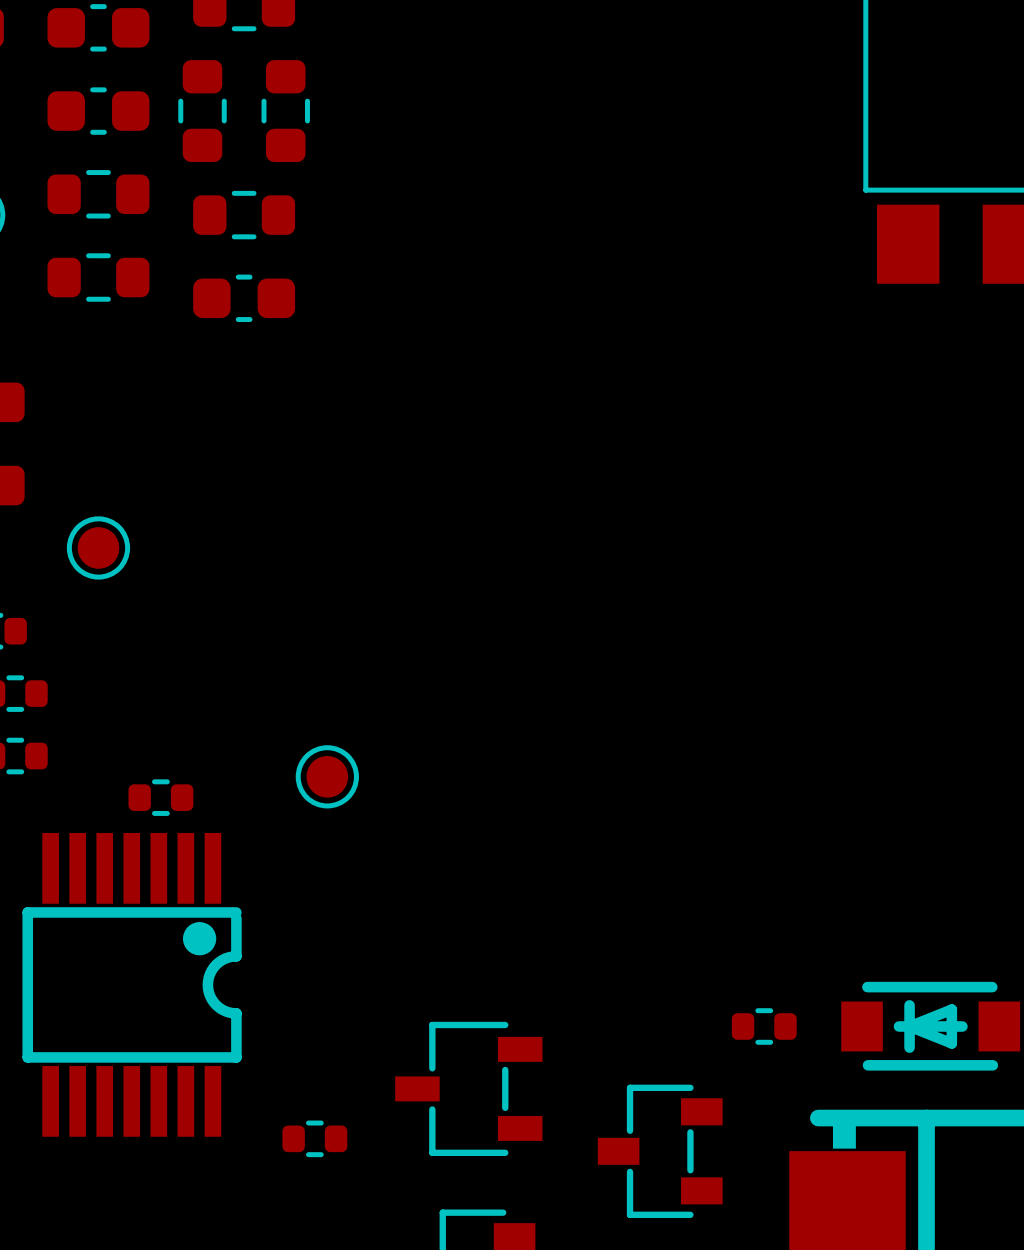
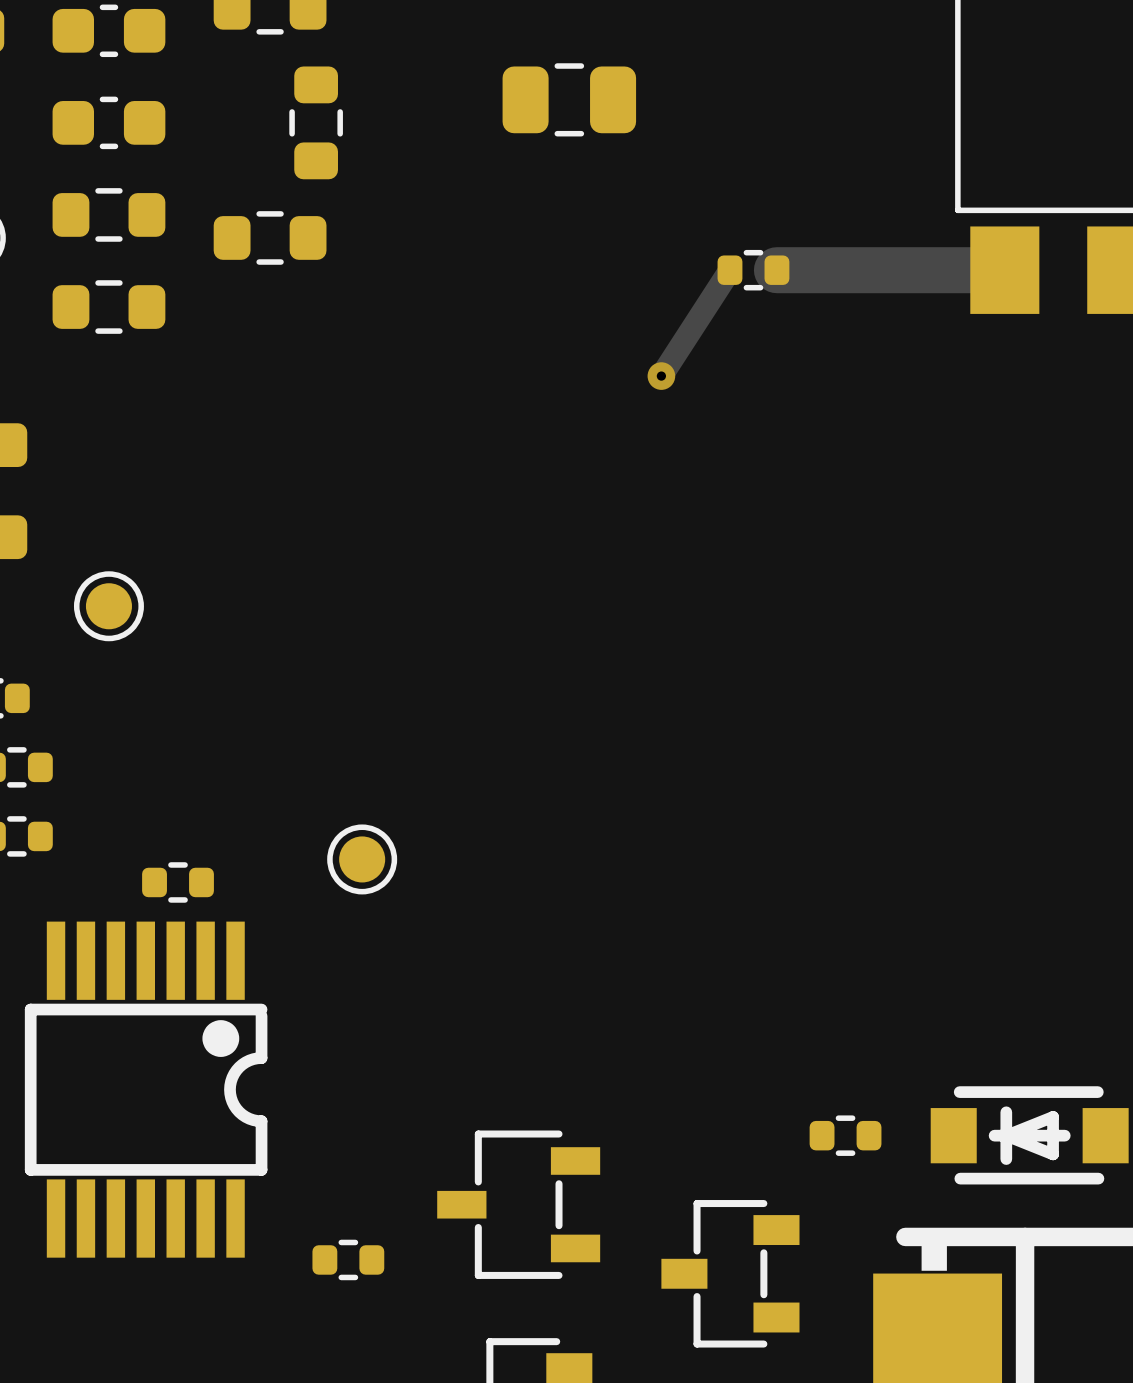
part: none -> (569, 99)
part: (202, 111) -> none
track: none -> (729, 270) (661, 376)
part: none -> (753, 270)
track: none -> (776, 270) (1004, 270)
part: (244, 298) -> none
via: none -> (661, 376)

